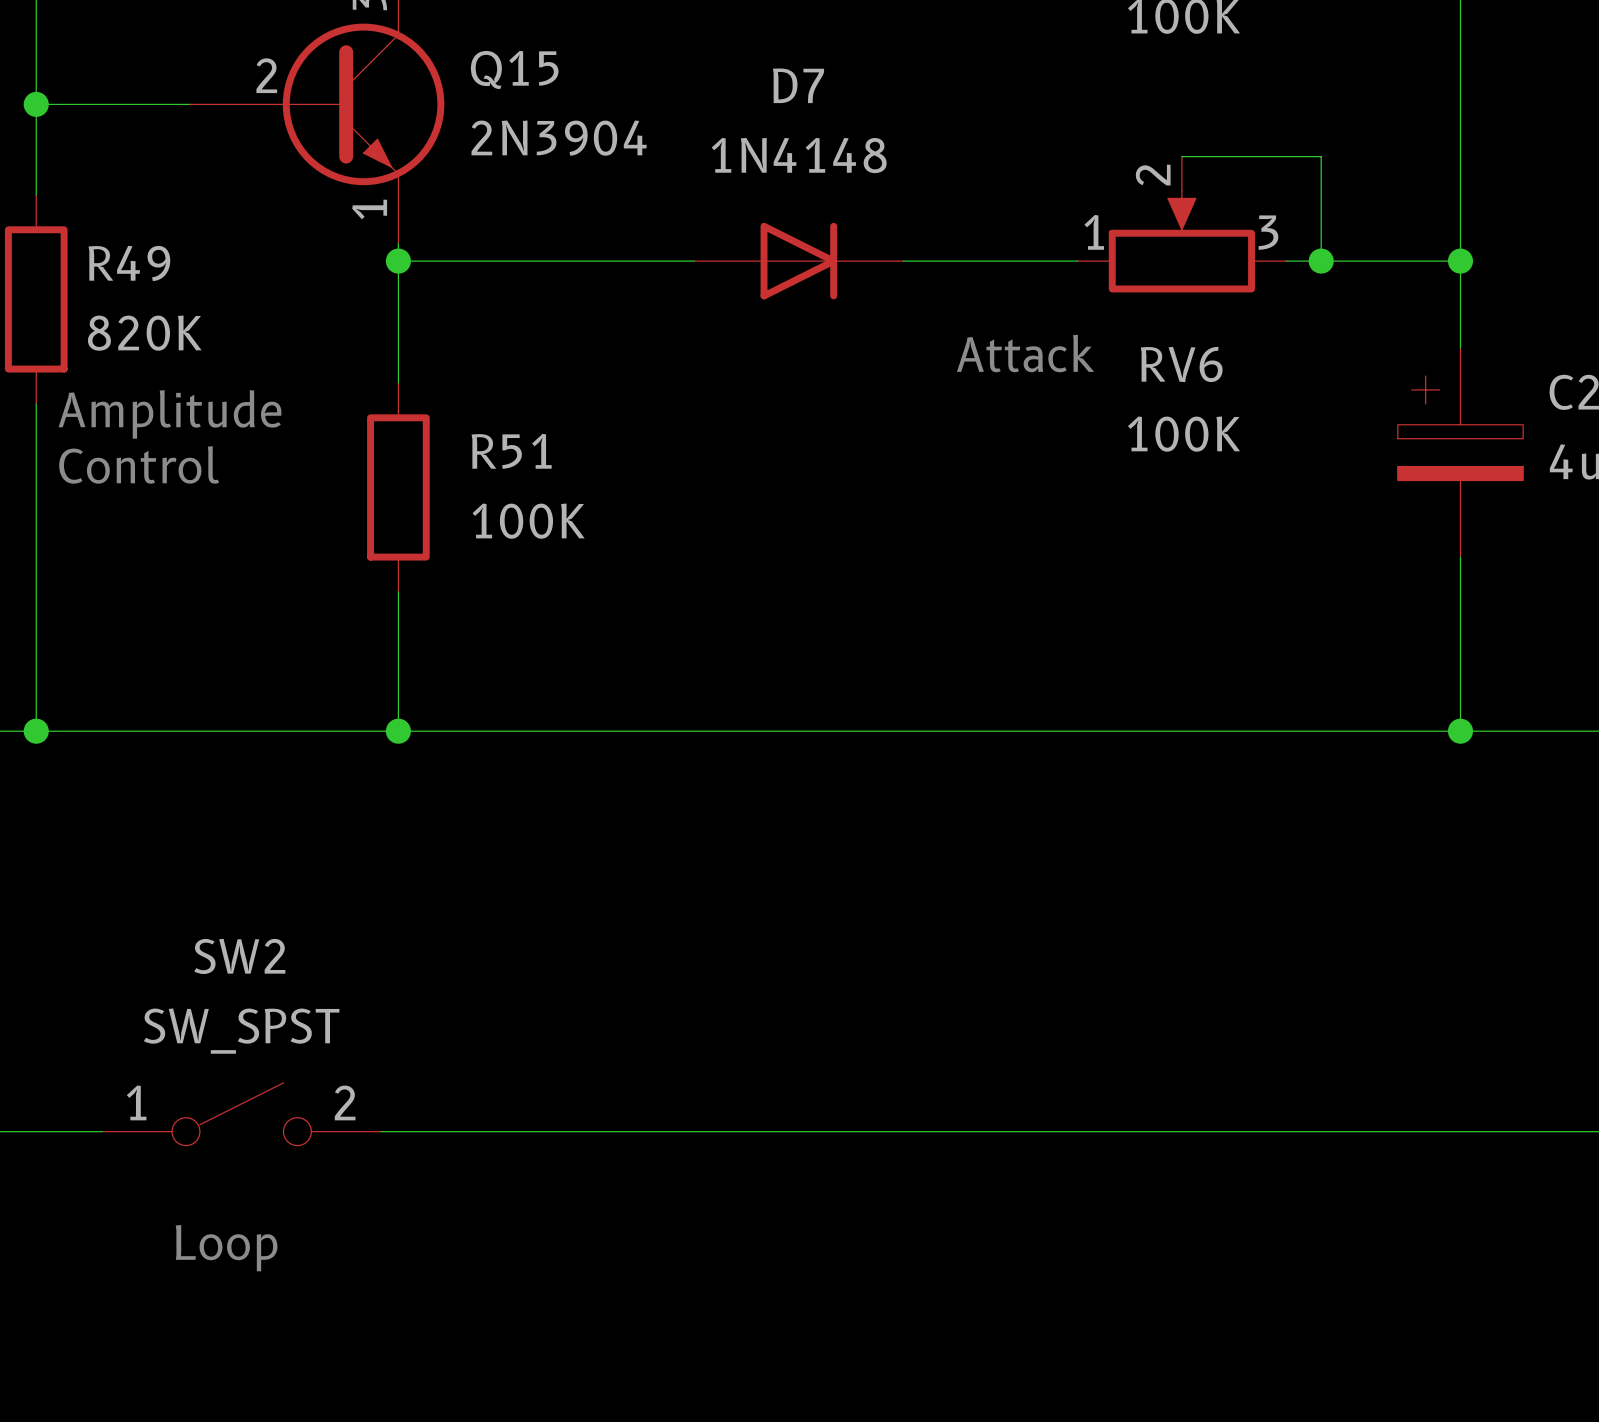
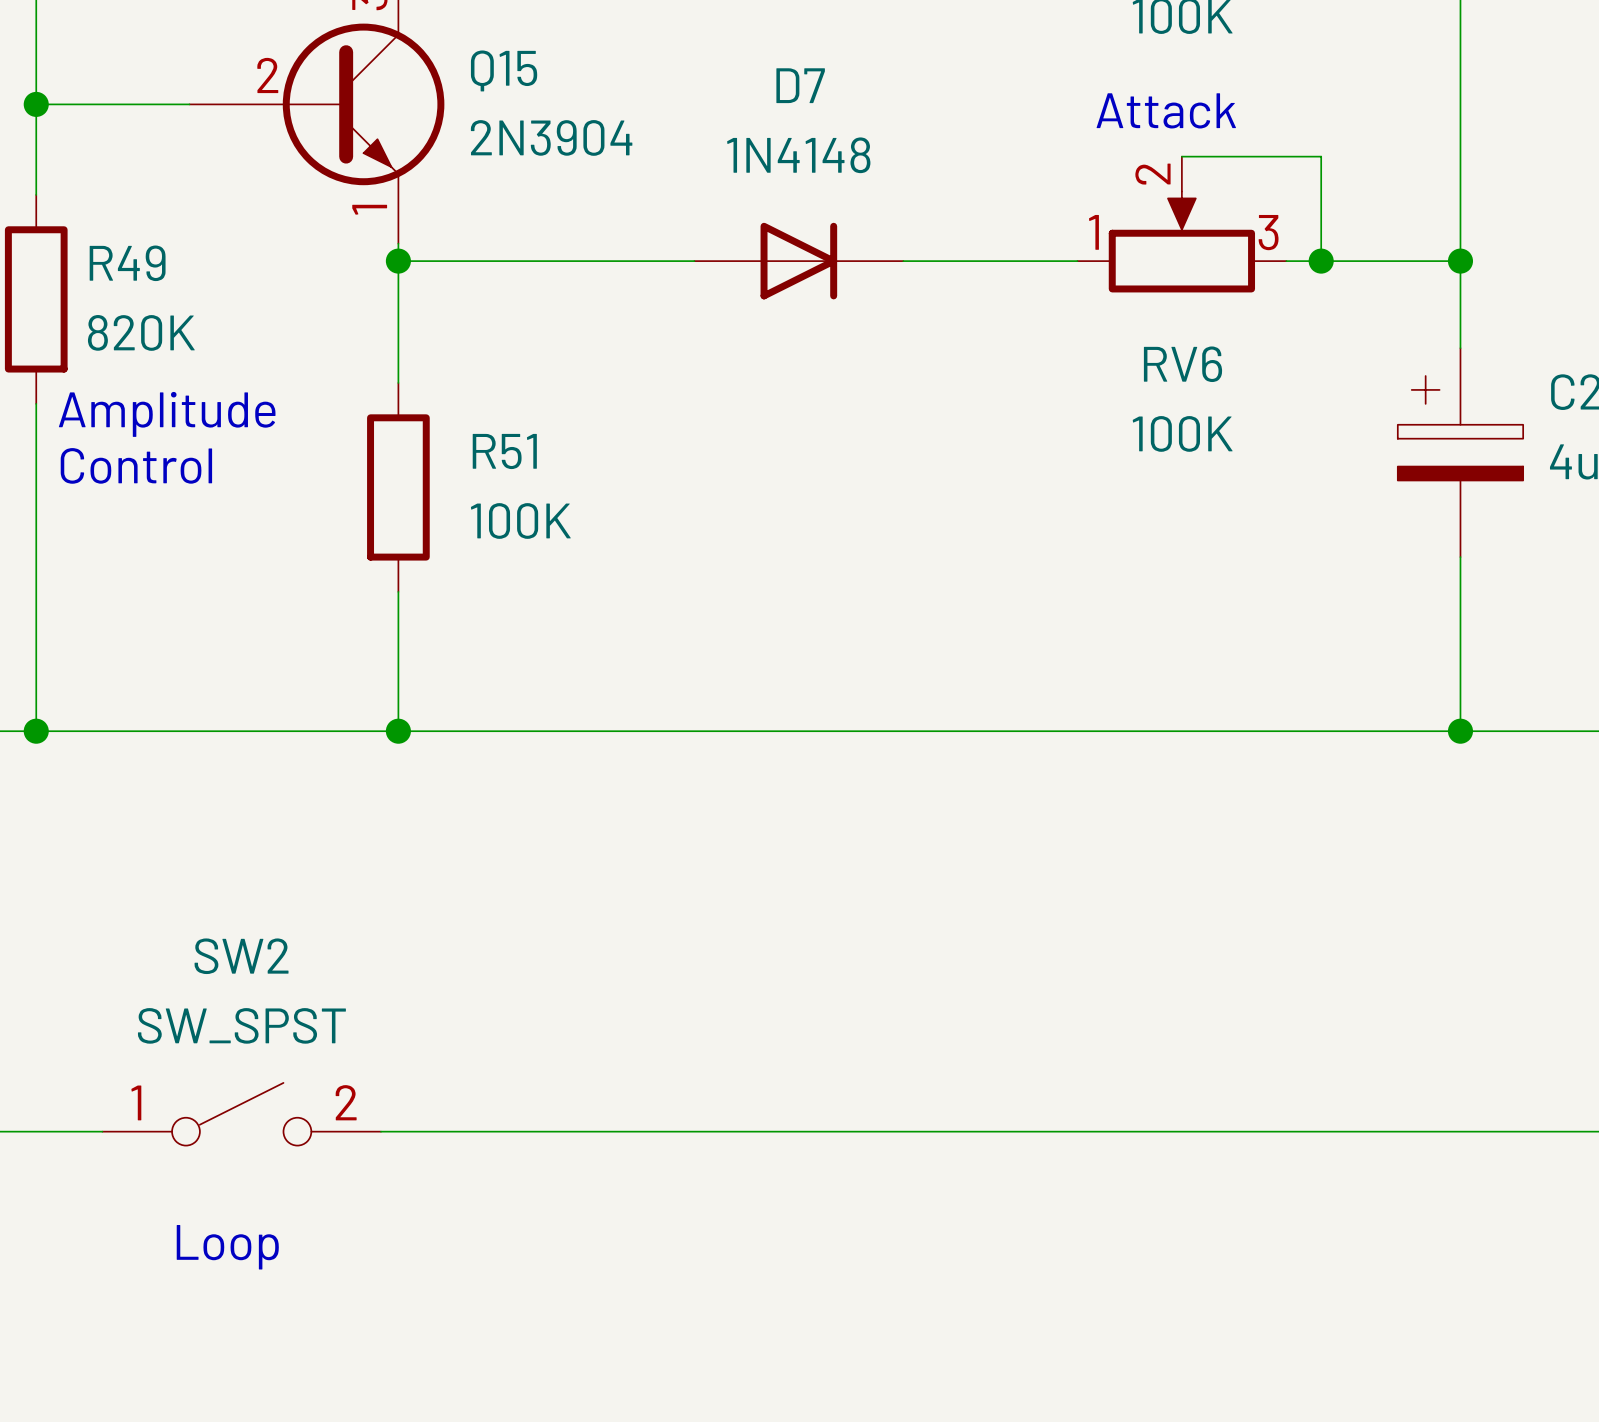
text position: Attack (1025, 353) -> Attack (1166, 110)

